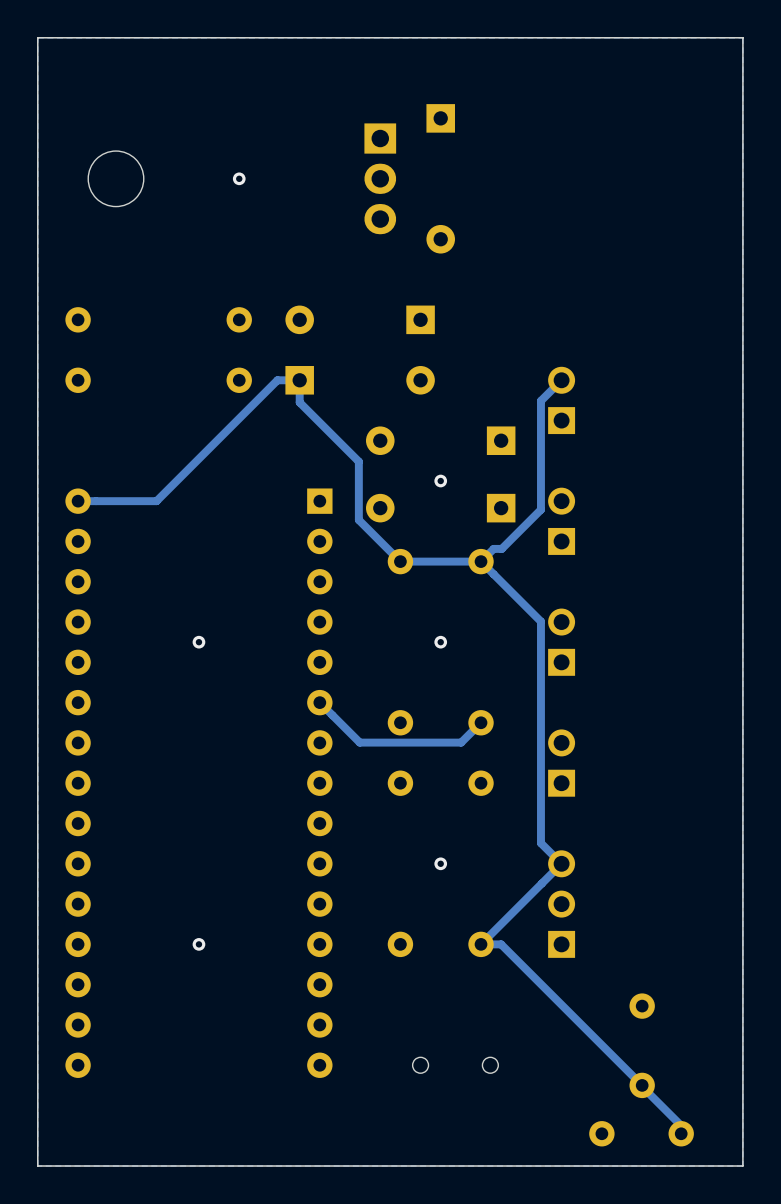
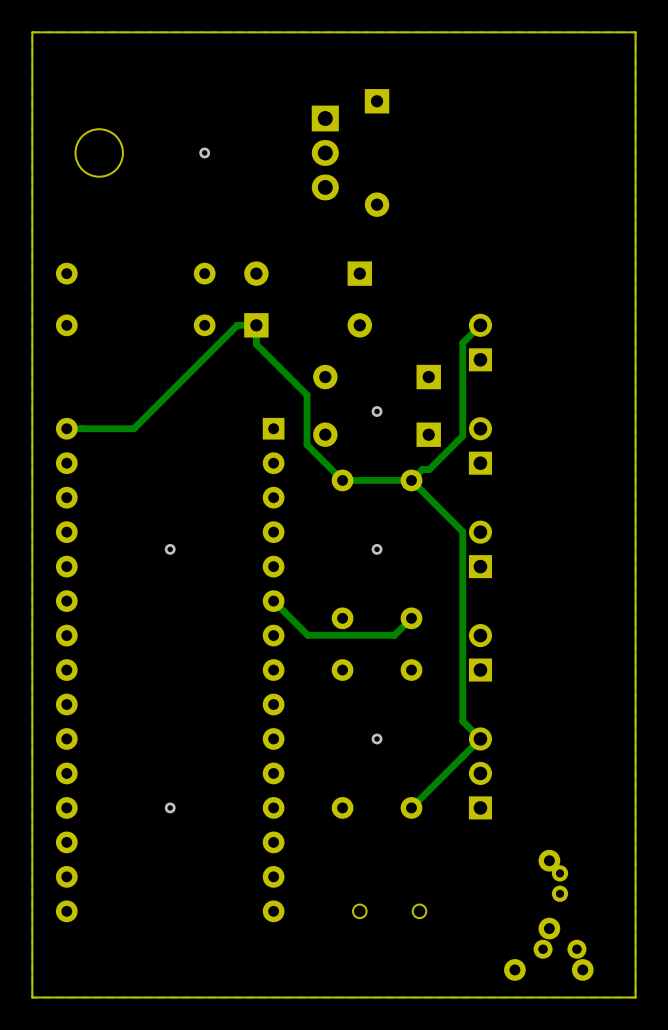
track: (481, 944) (501, 944) (681, 1125) -> none
part: none -> (560, 883)
part: none -> (560, 949)

